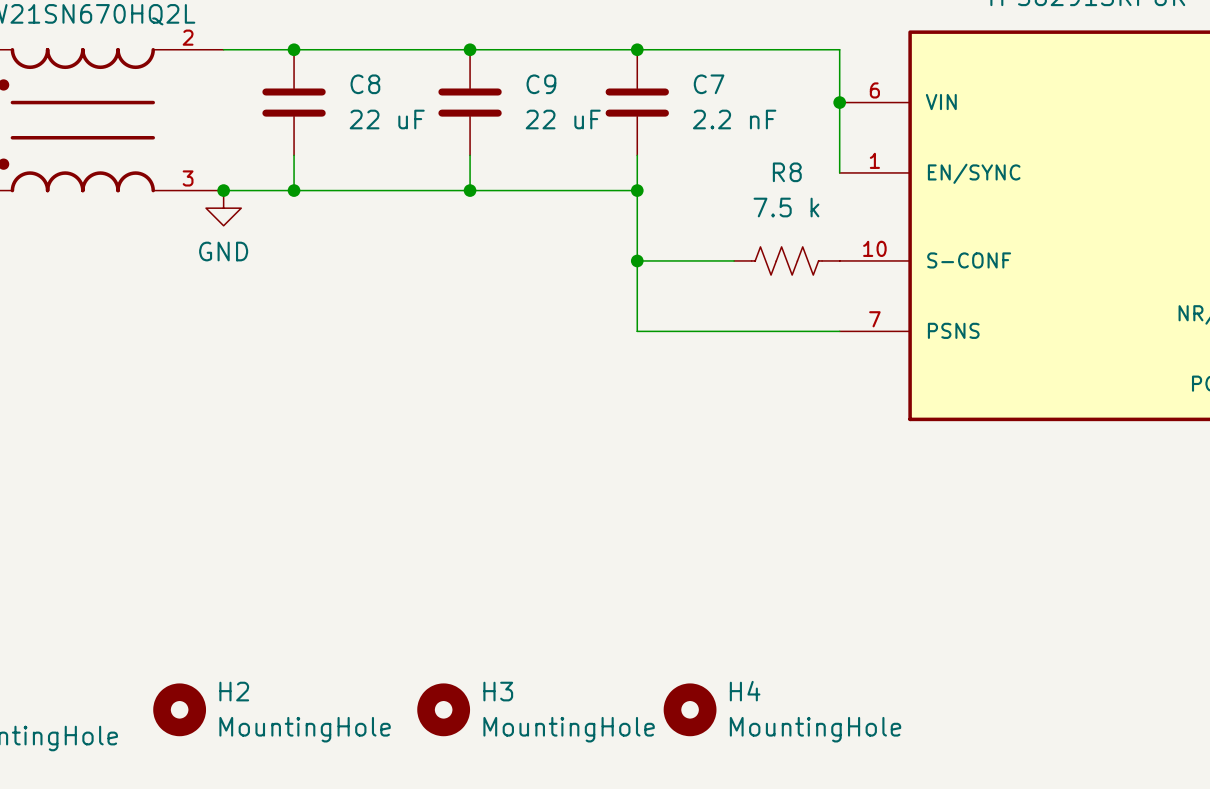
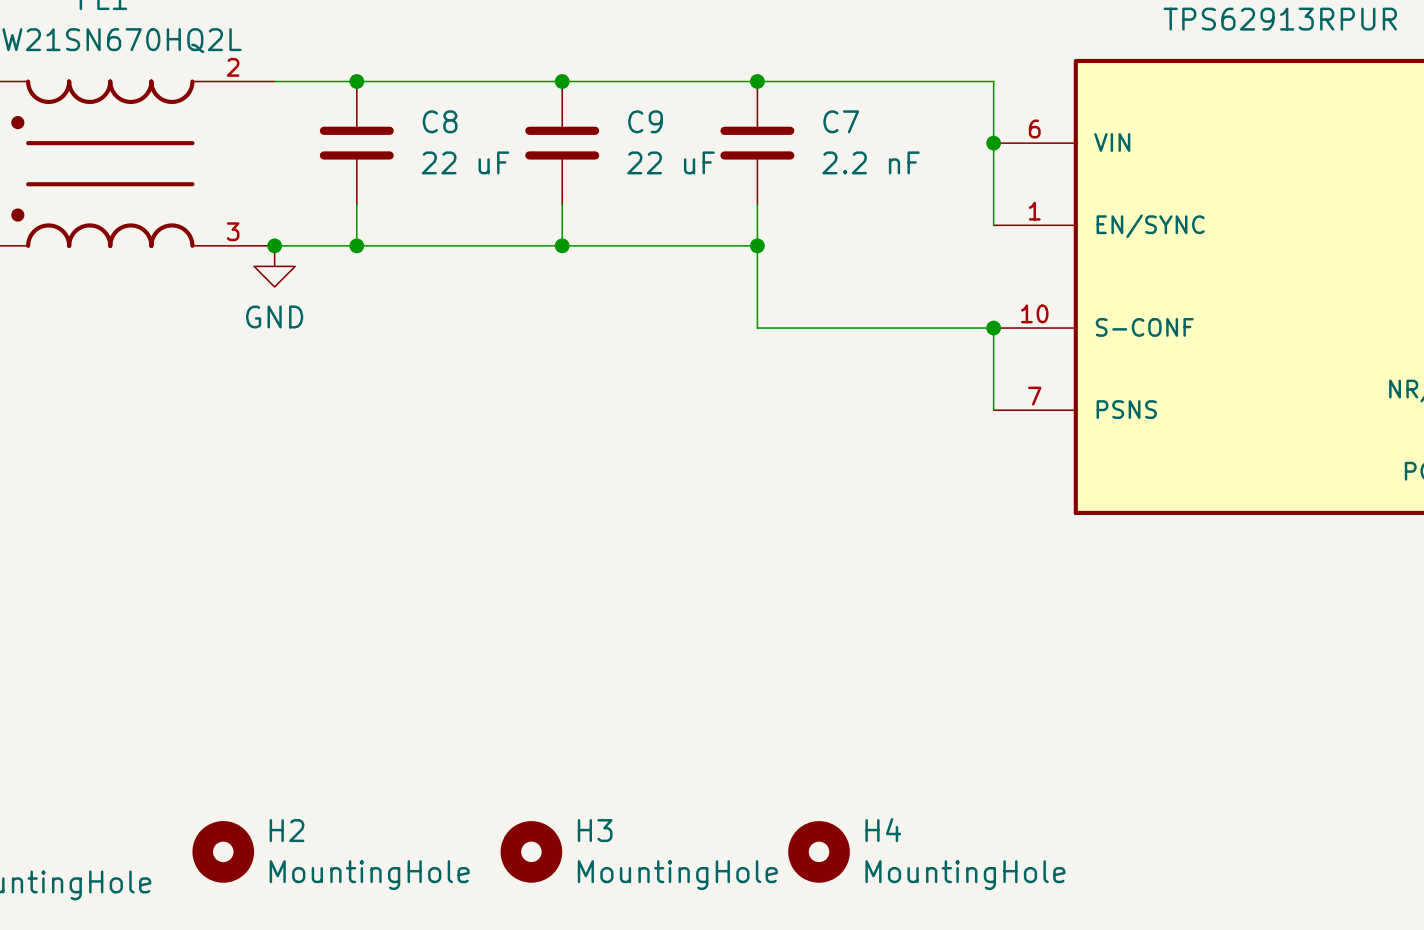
wire: (637, 260) (637, 331) (839, 331) -> (870, 328) (993, 328) (993, 410)
junction: (637, 260) -> none
R8: 7.5 k (786, 260) -> none
junction: none -> (993, 328)

